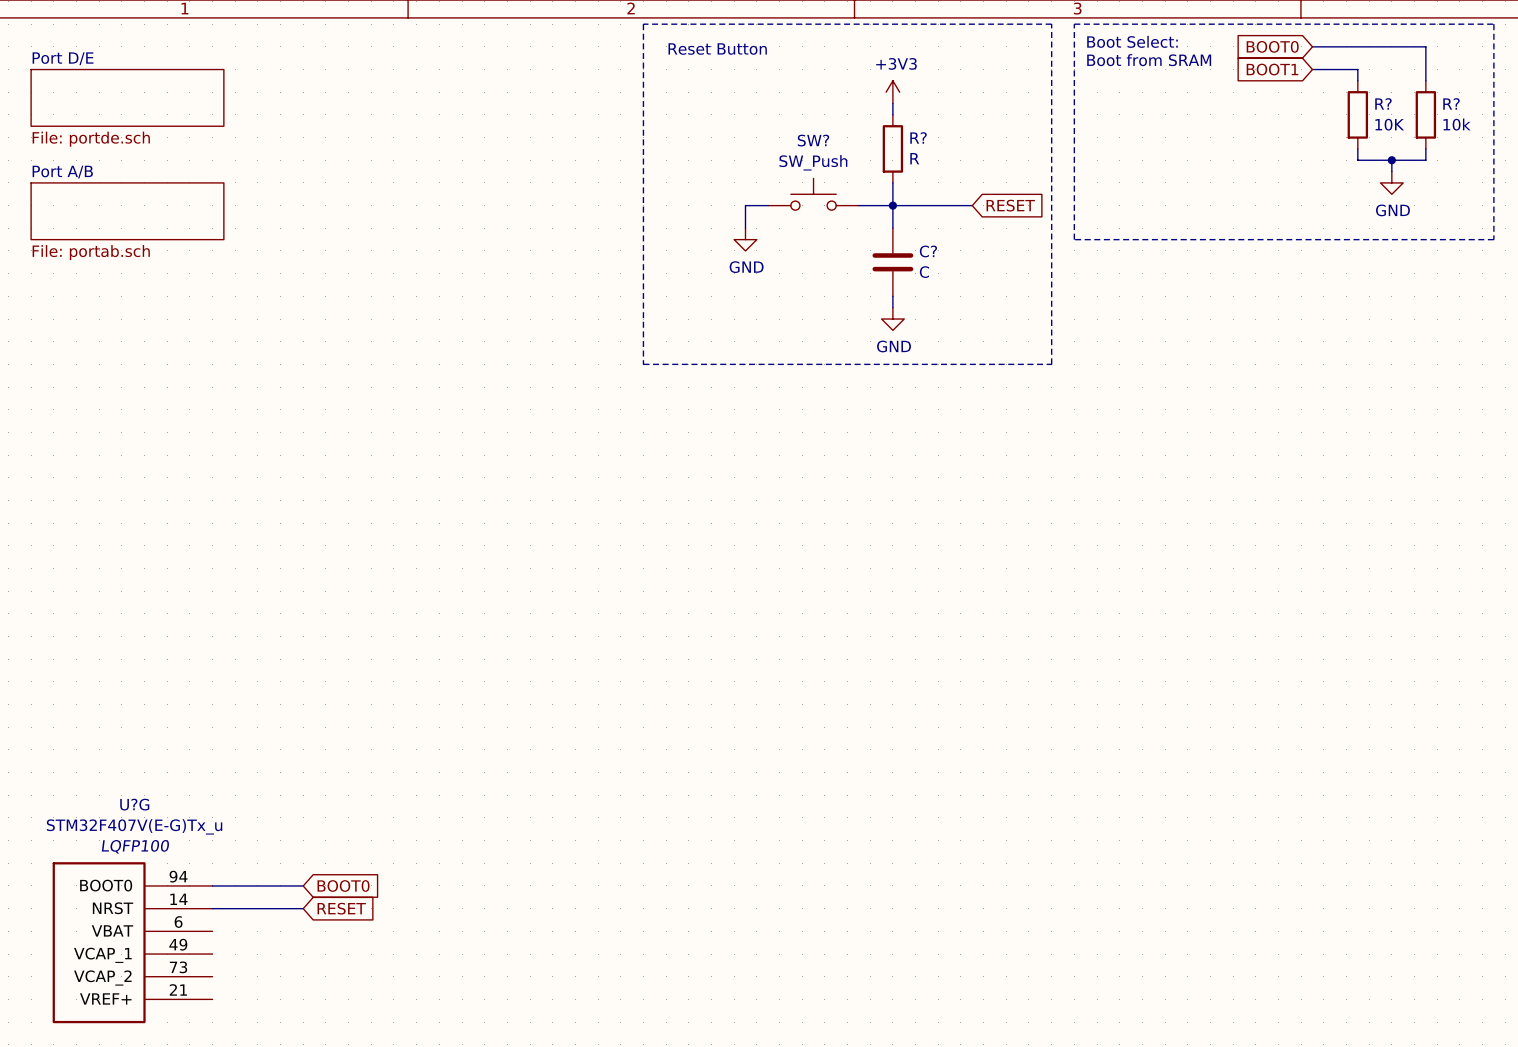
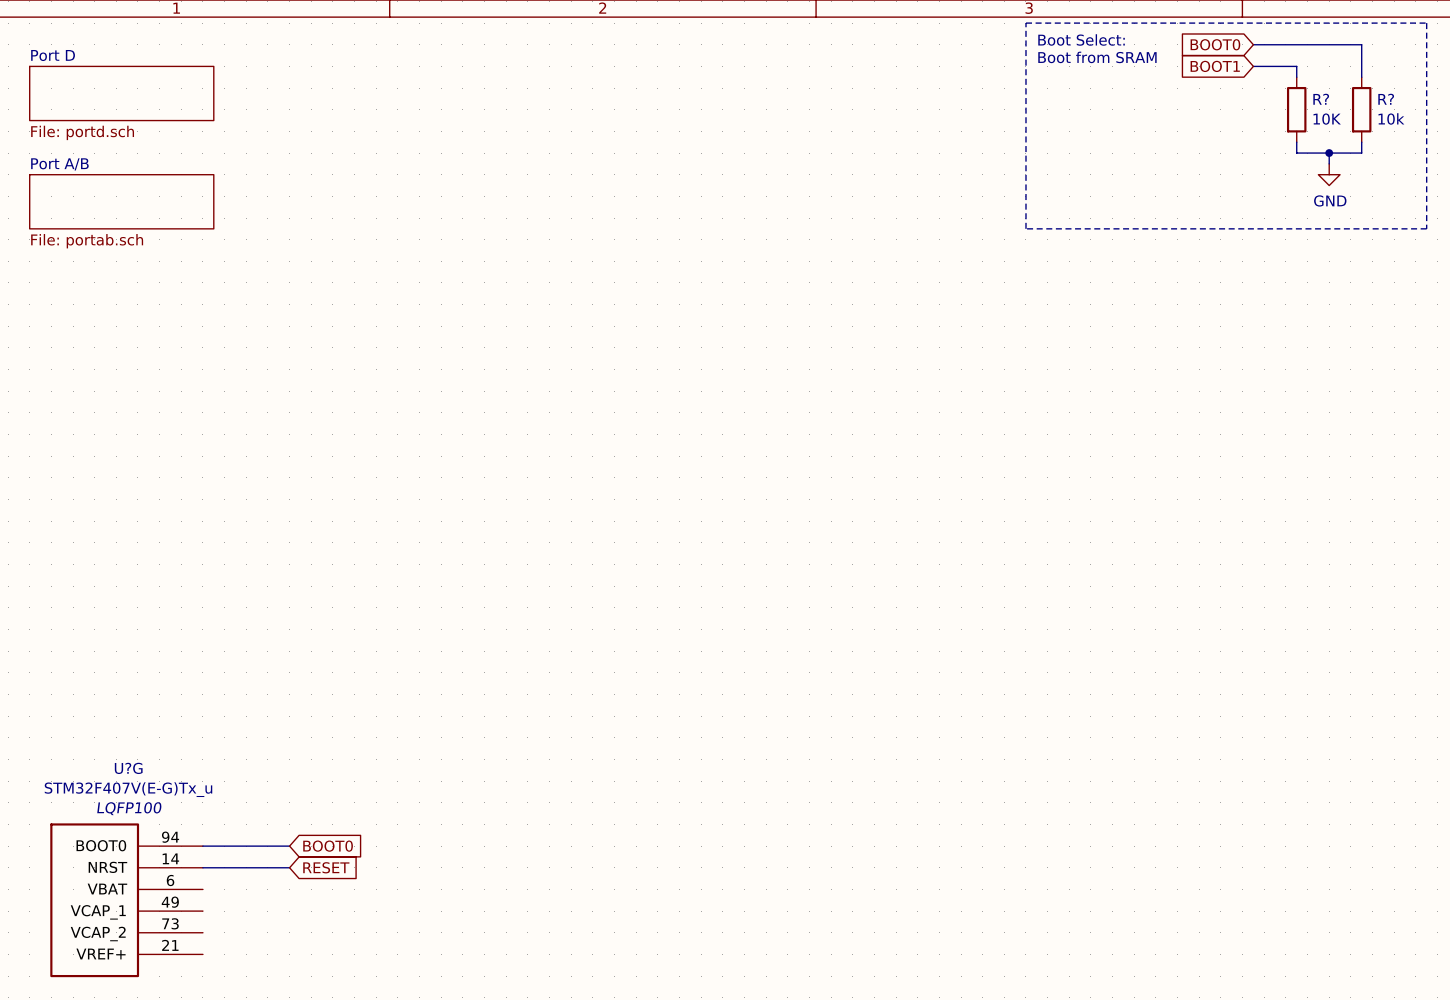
line: (643, 24) (1051, 24) (1051, 364) (643, 364) (643, 24) -> none
text: Reset Button (717, 49) -> none
sheet Port D/E name: Port D/E (63, 58) -> Port D (53, 55)
power symbol: +3V3 (892, 92) -> none
wire: (892, 103) (892, 114) -> none
sheet Port D/E value: File: portde.sch (91, 139) -> File: portd.sch (82, 132)
R?: R (892, 148) -> none
wire: (892, 182) (892, 228) -> none
SW?: SW_Push (813, 194) -> none
wire: (768, 205) (745, 205) (745, 228) -> none
wire: (858, 205) (972, 205) -> none
junction: (892, 205) -> none
global label: RESET (1010, 205) -> none
power symbol: GND (745, 239) -> none
C?: C (892, 262) -> none
wire: (892, 296) (892, 307) -> none
power symbol: GND (892, 319) -> none

